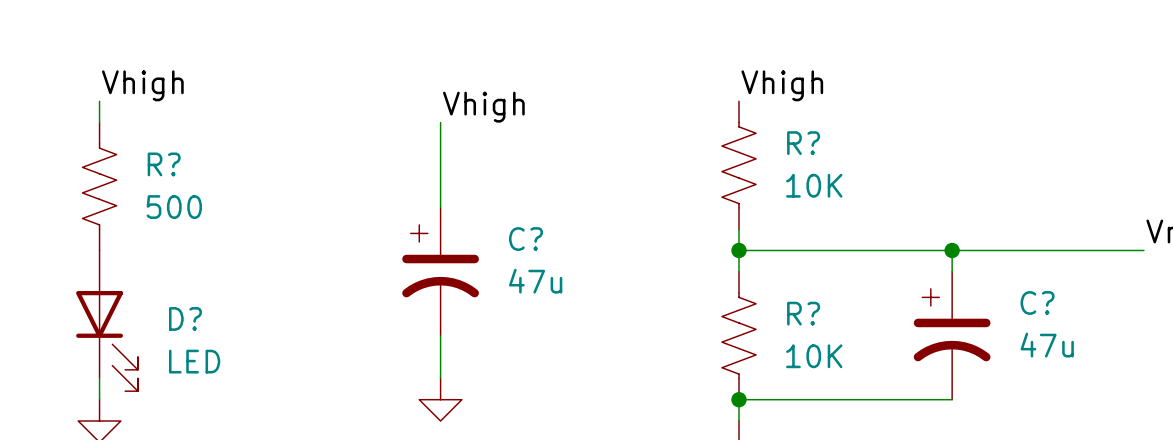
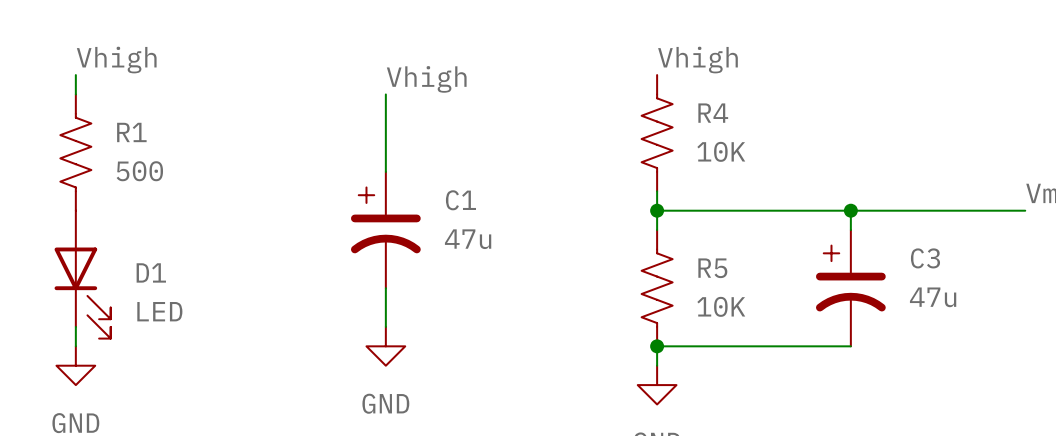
R? name: R? (803, 143) -> R4 (713, 113)
R? name: R? (164, 164) -> R1 (131, 132)
C? name: C? (526, 239) -> C1 (460, 200)
C? name: C? (1037, 302) -> C3 (925, 258)
R? name: R? (803, 313) -> R5 (712, 268)
D? name: D? (185, 318) -> D1 (151, 272)

